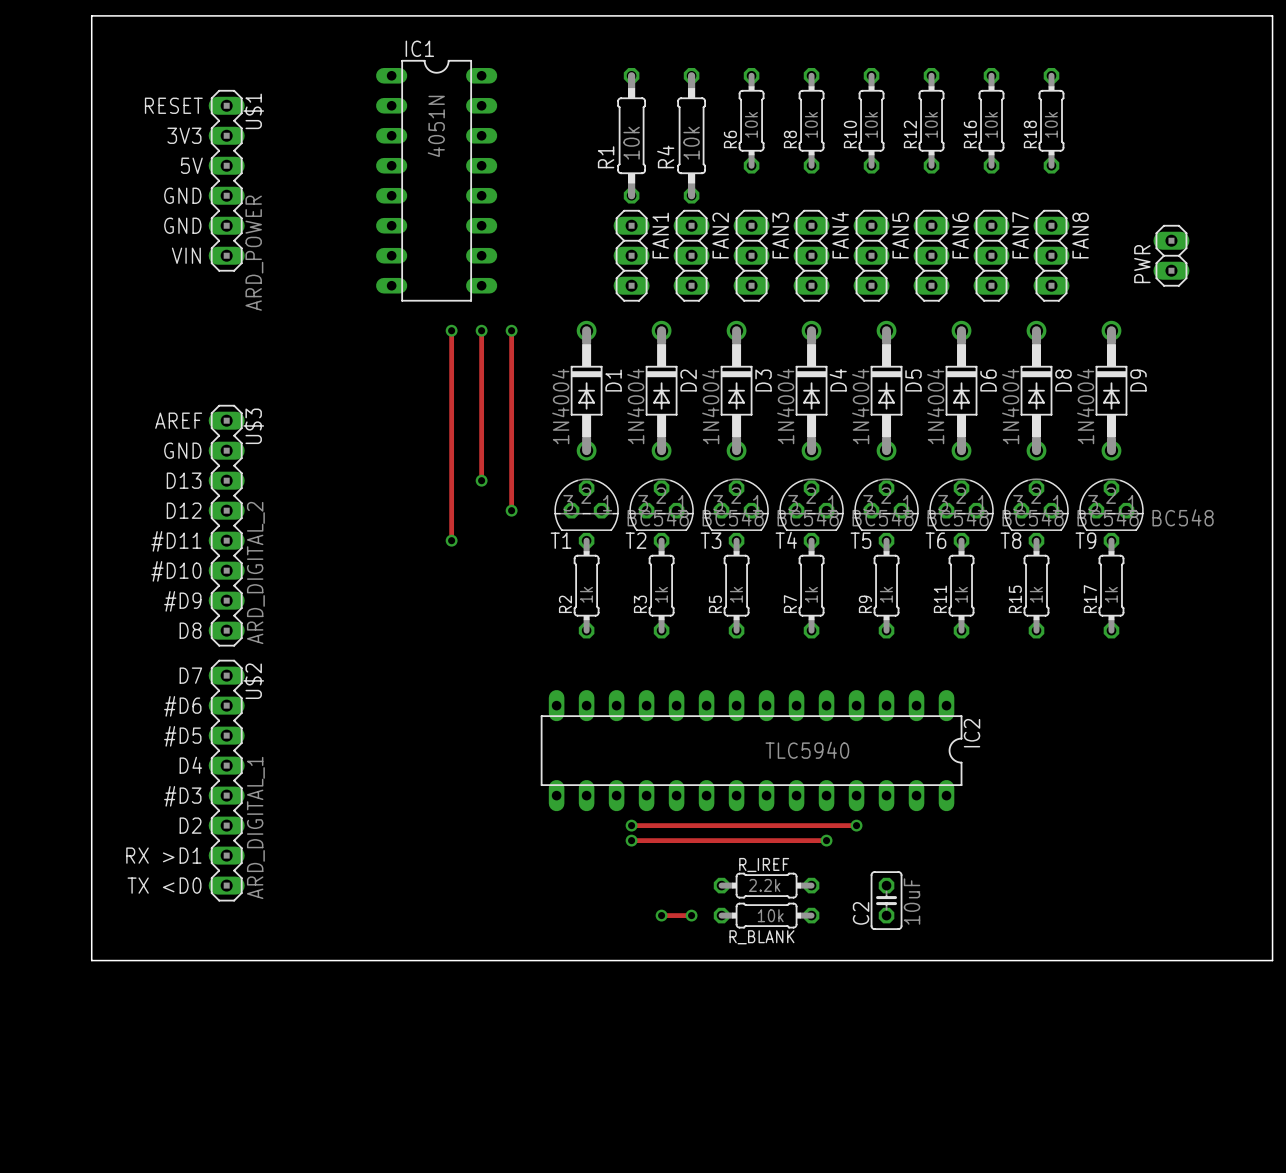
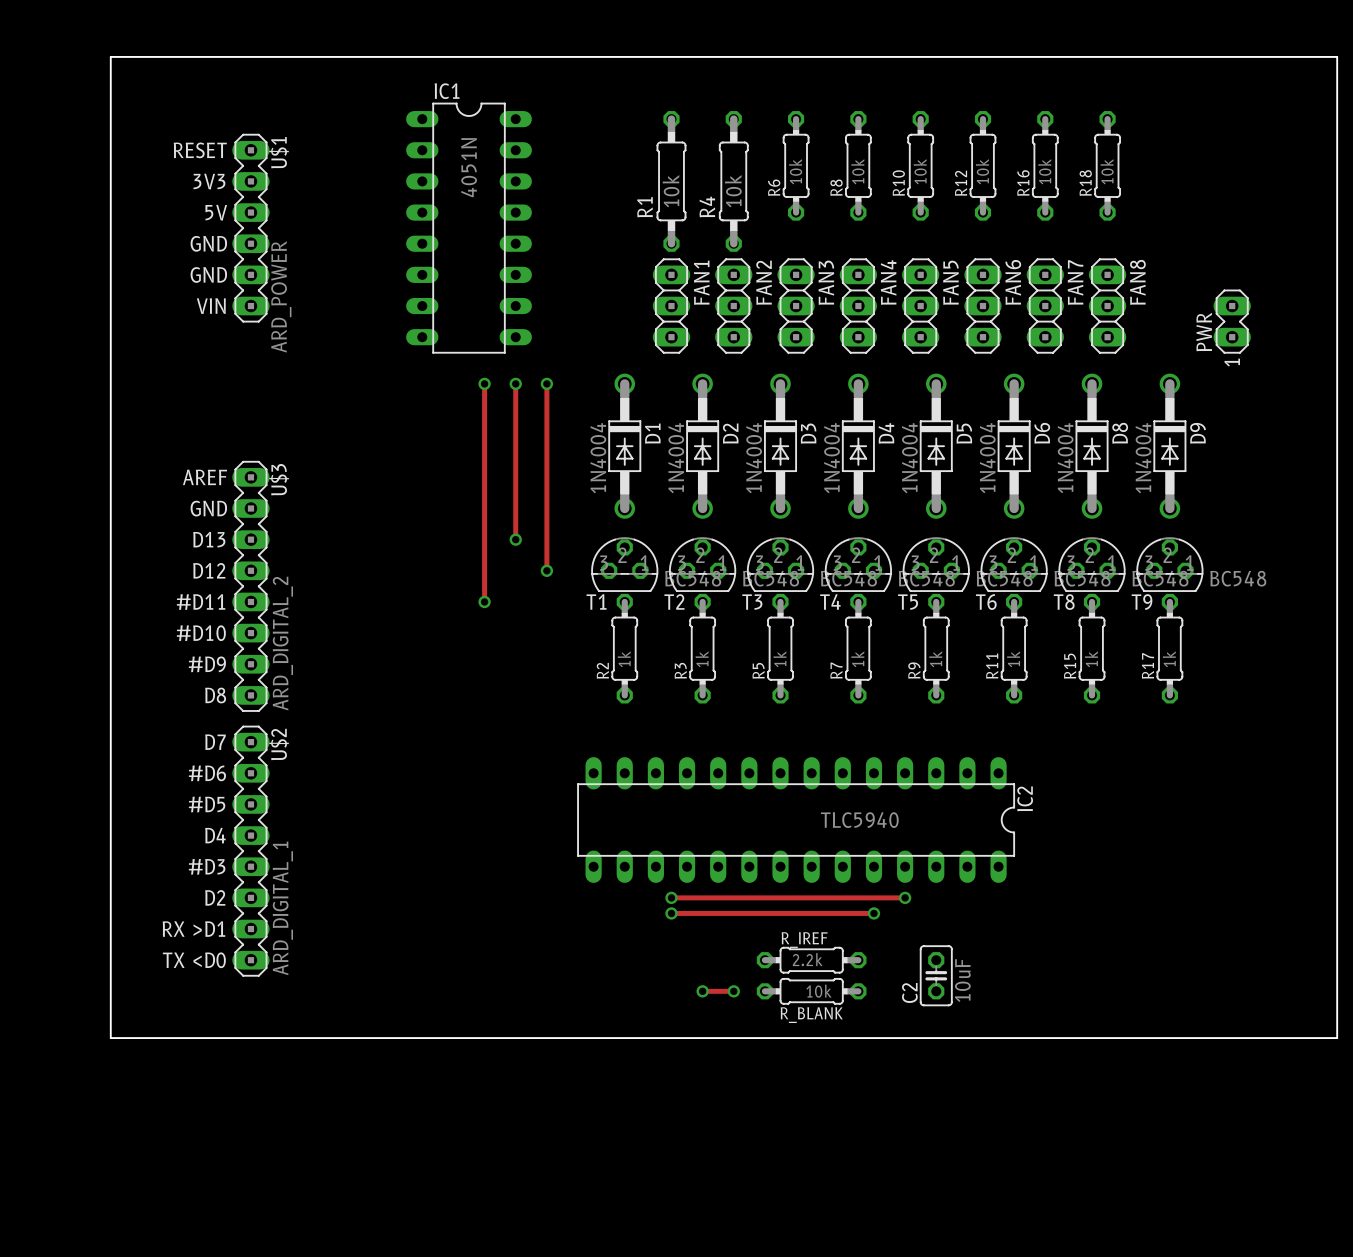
PWR: (1171, 255) -> none
PWR: none -> (1232, 321)

